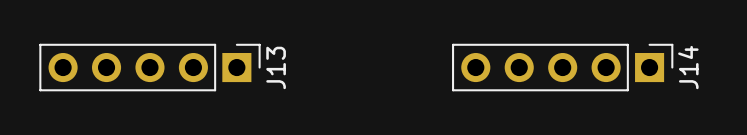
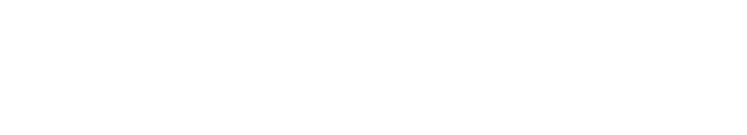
J13: (149, 67) -> none
J14: (562, 67) -> none

